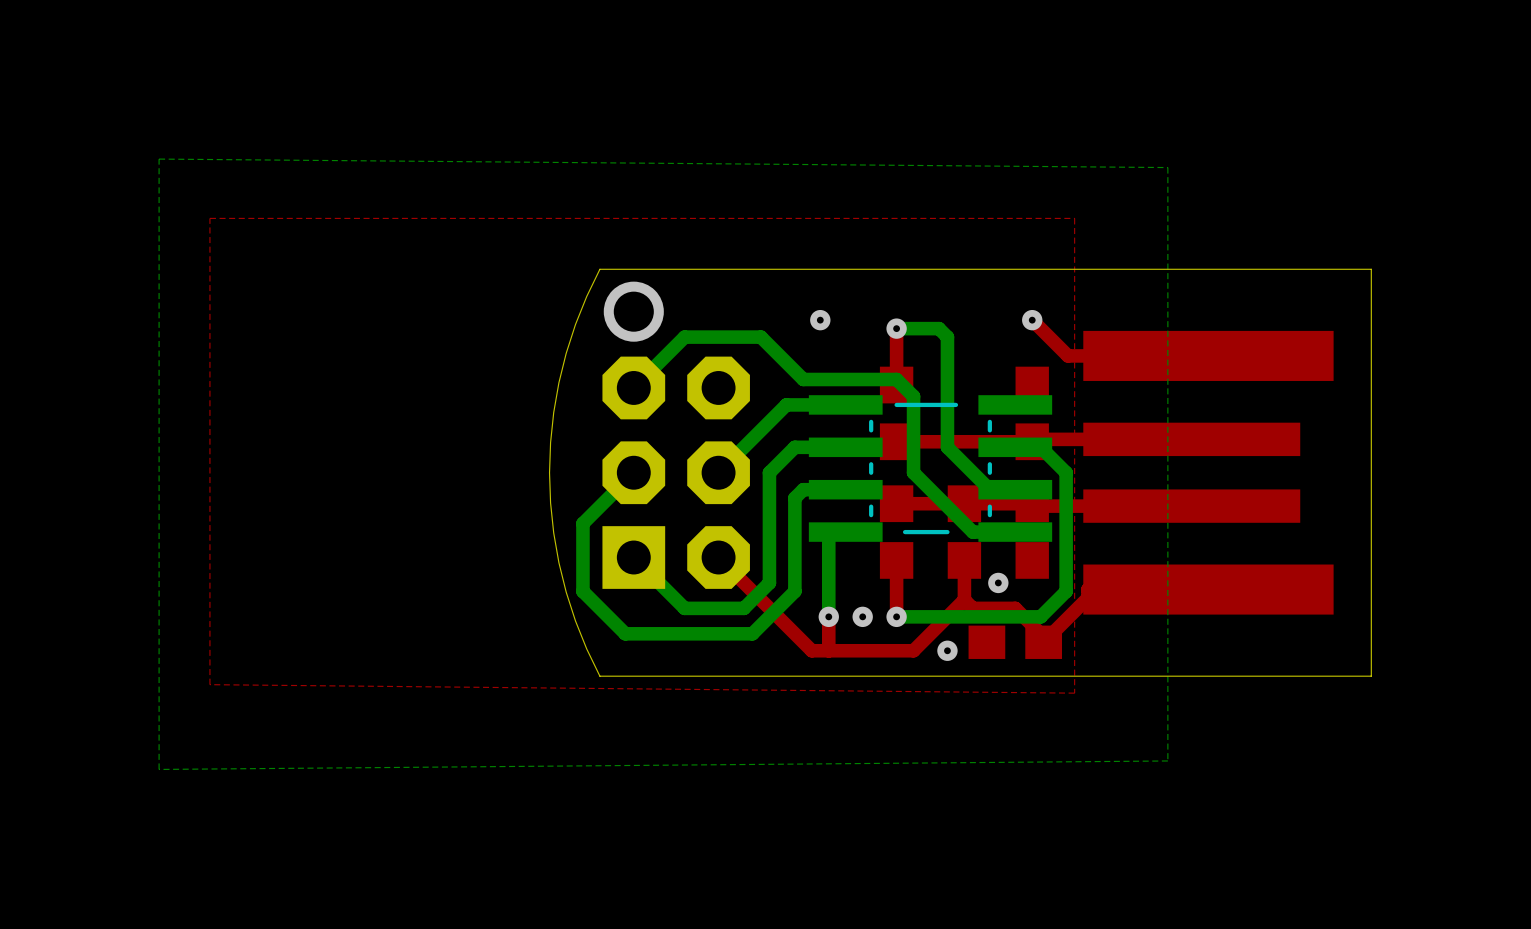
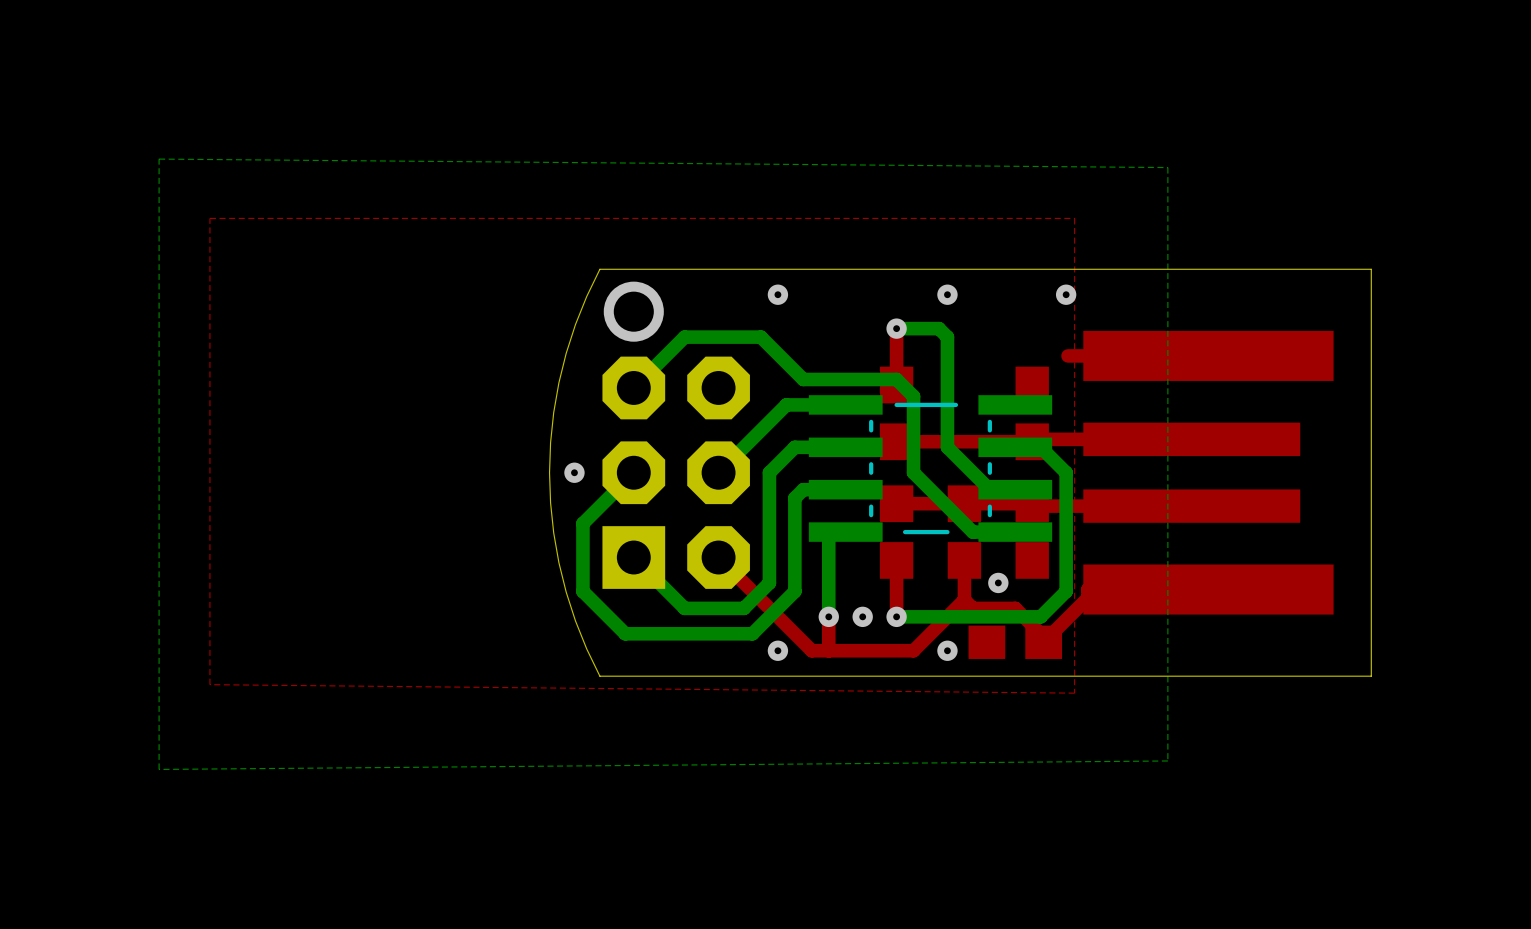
via: none -> (947, 294)
via position: (820, 320) -> (777, 294)
top track: (1032, 320) (1068, 355) -> none
via position: (1032, 320) -> (1066, 294)
via: none -> (574, 472)
via: none -> (777, 650)

